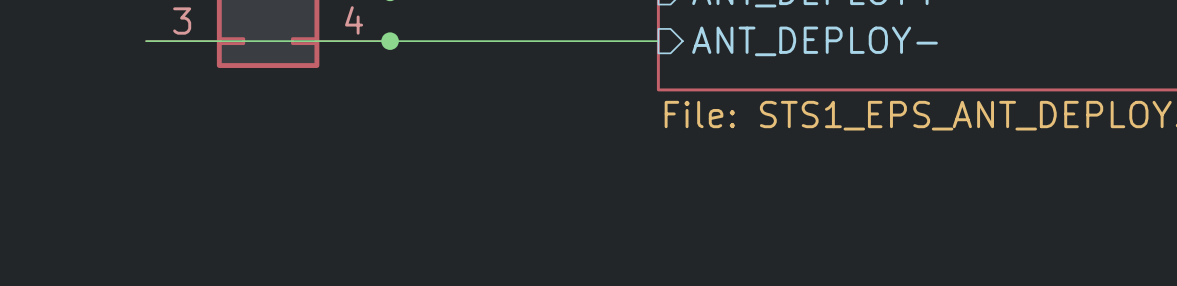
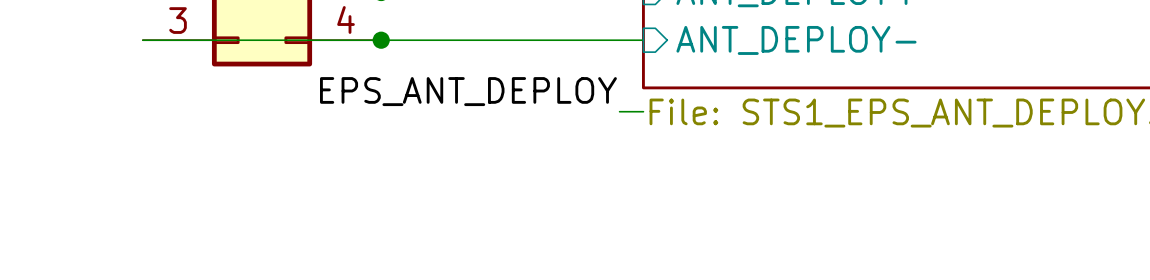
label: none -> EPS_ANT_DEPLOY (468, 91)
wire: none -> (619, 111) (643, 111)

